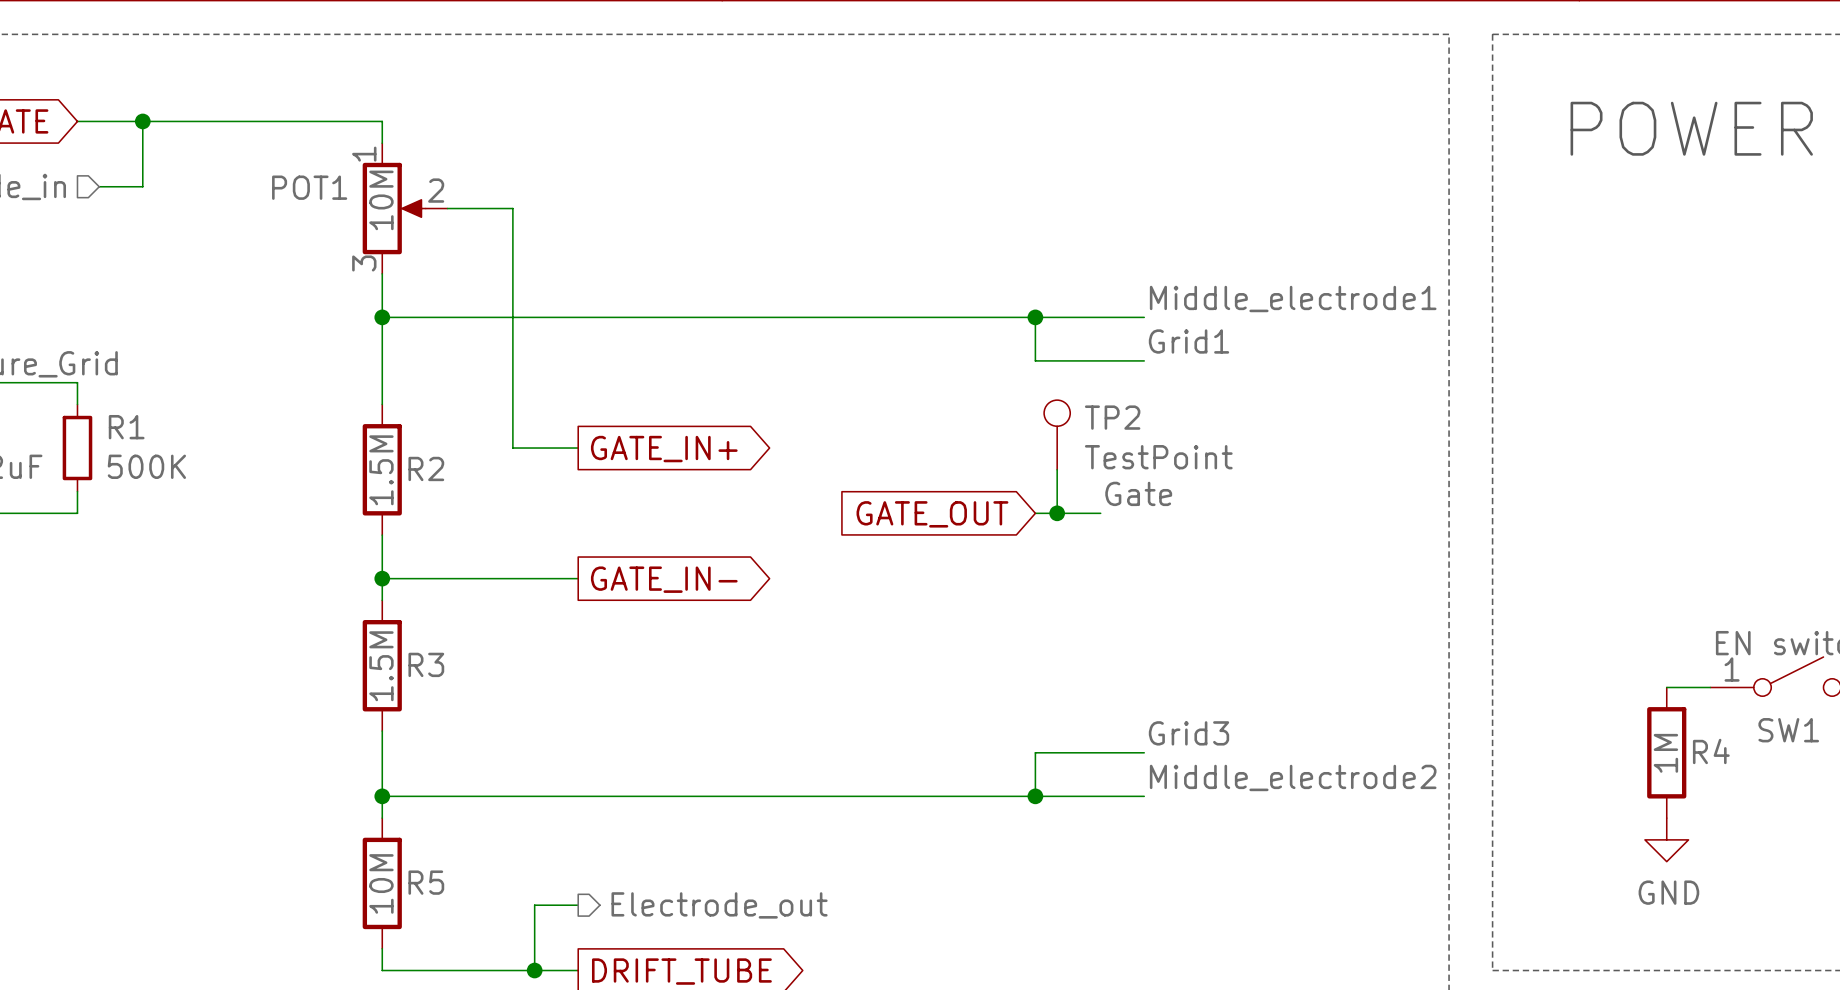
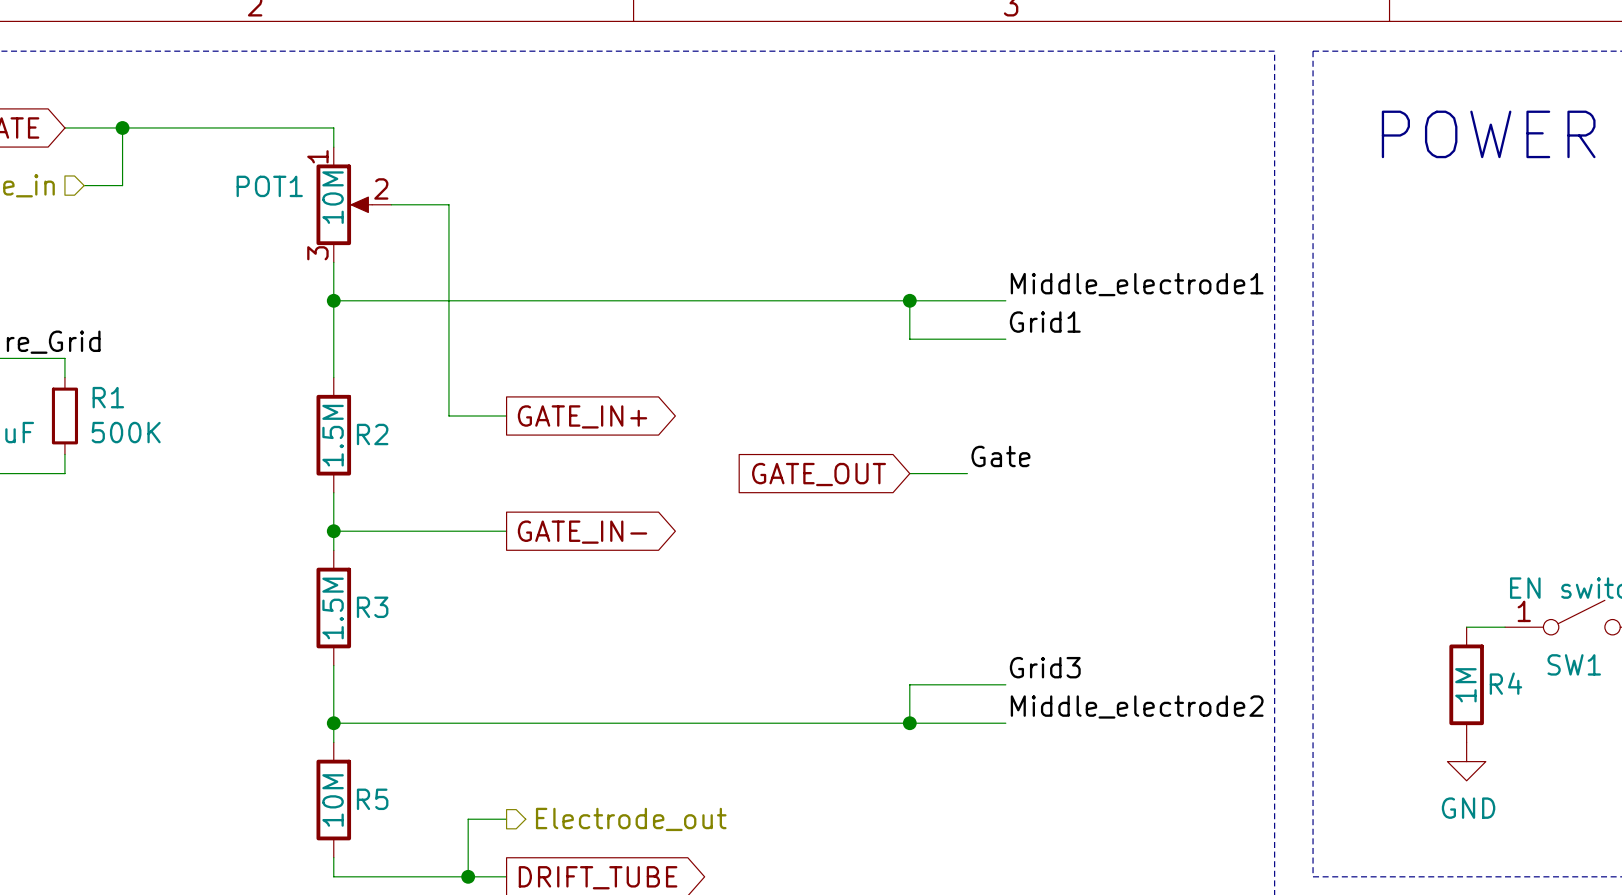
TP2: TestPoint (1057, 434) -> none
wire: (1057, 469) (1057, 513) -> none
junction: (1057, 513) -> none

